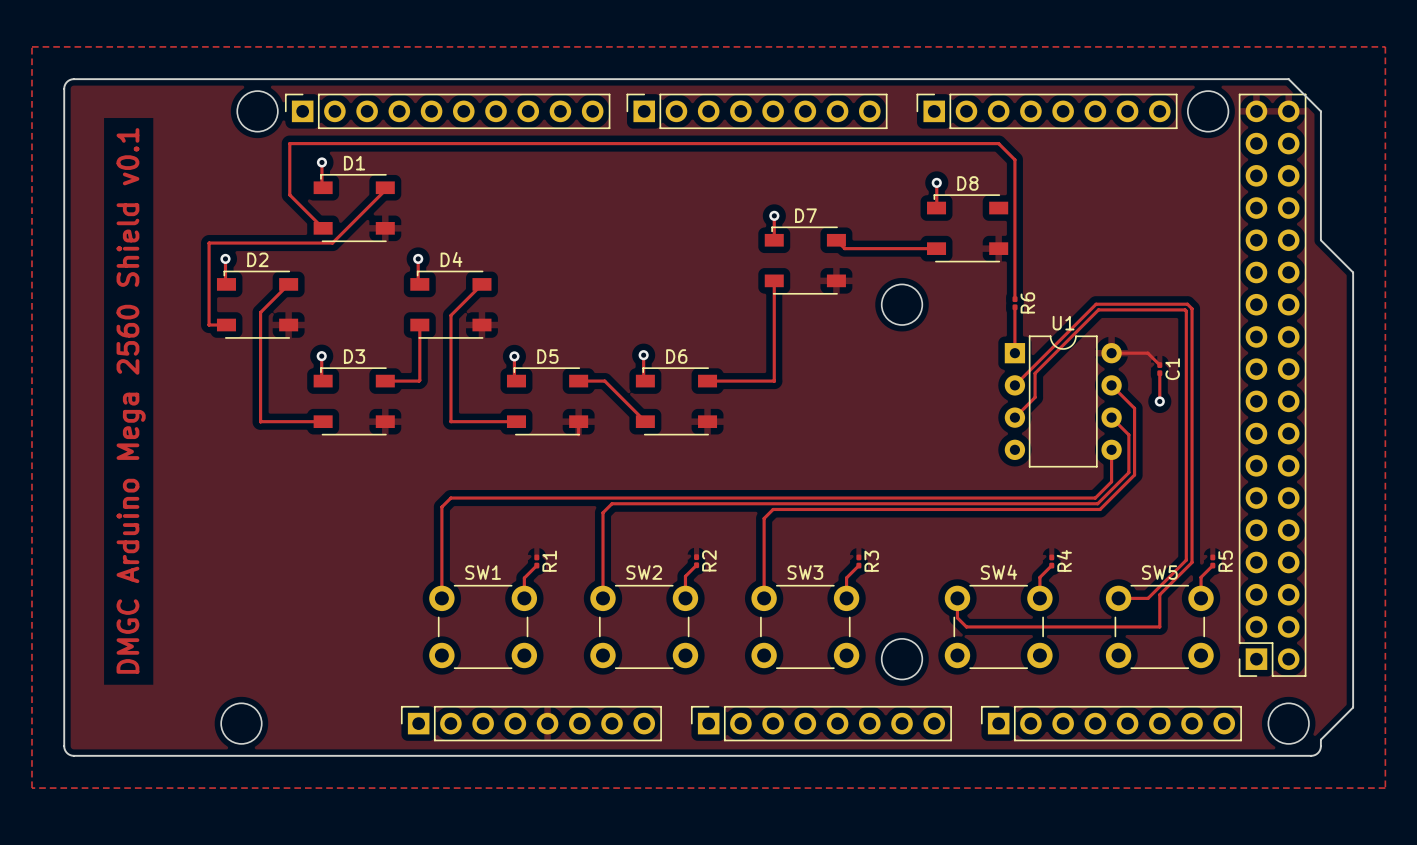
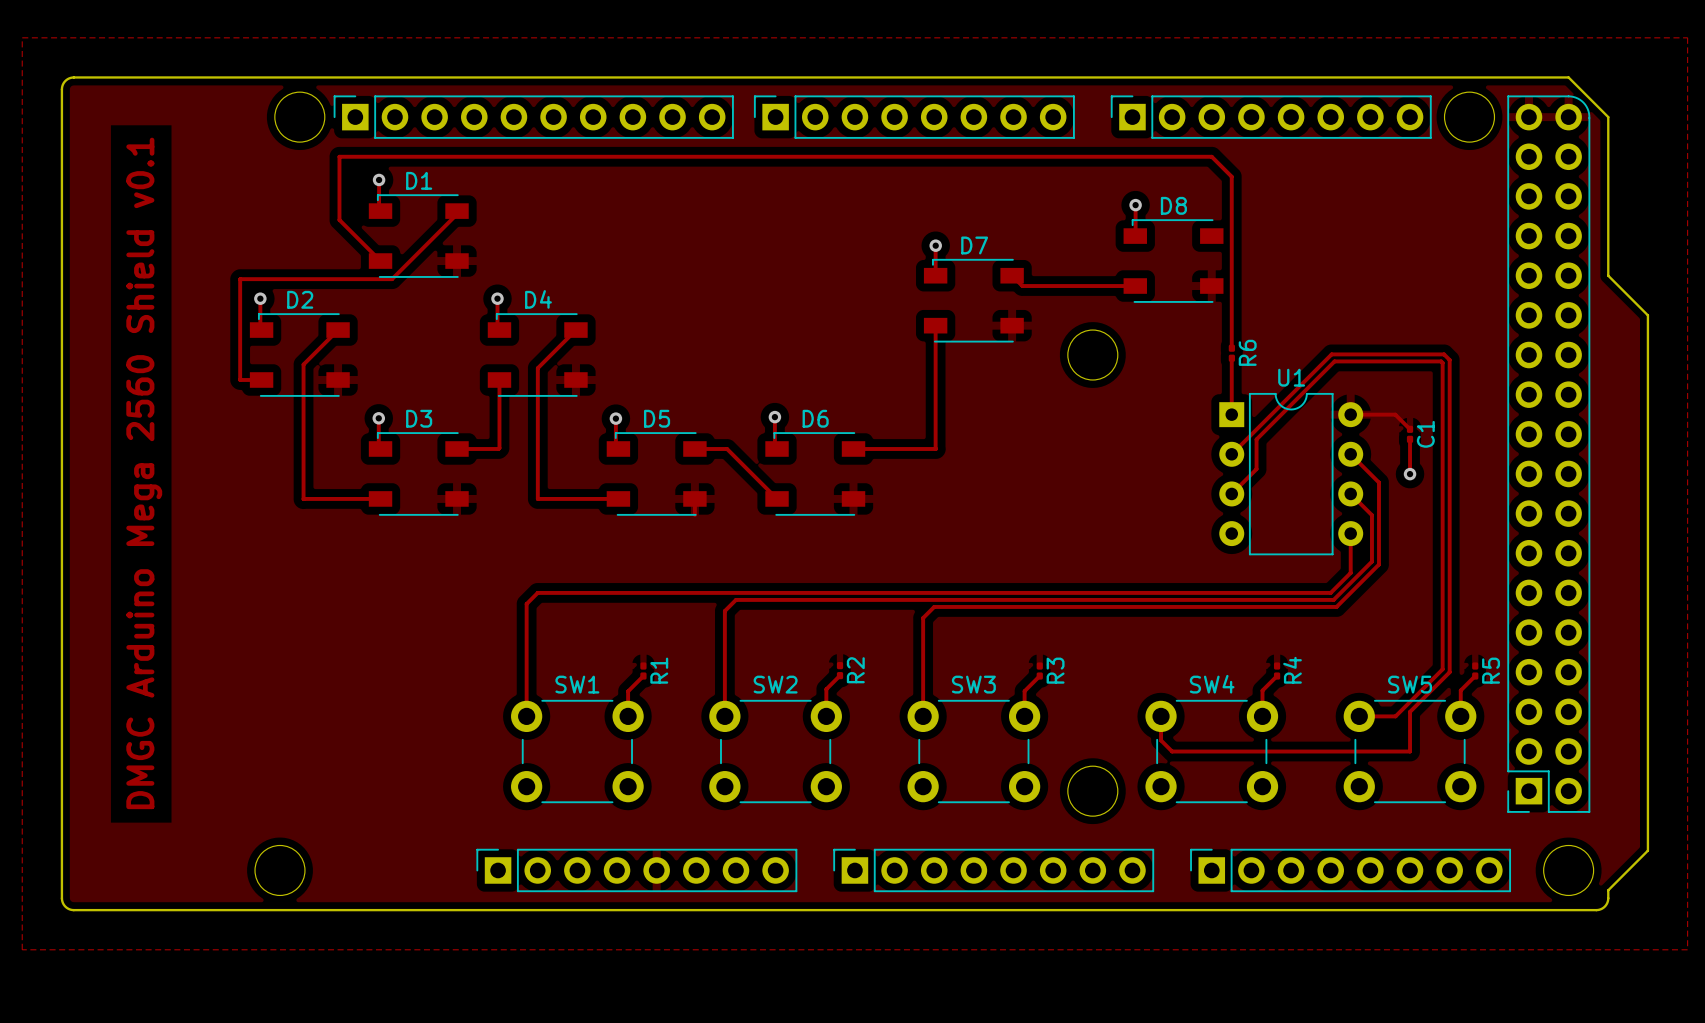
part footprint: [1238, 93, 1307, 677] -> [1507, 95, 1591, 813]

